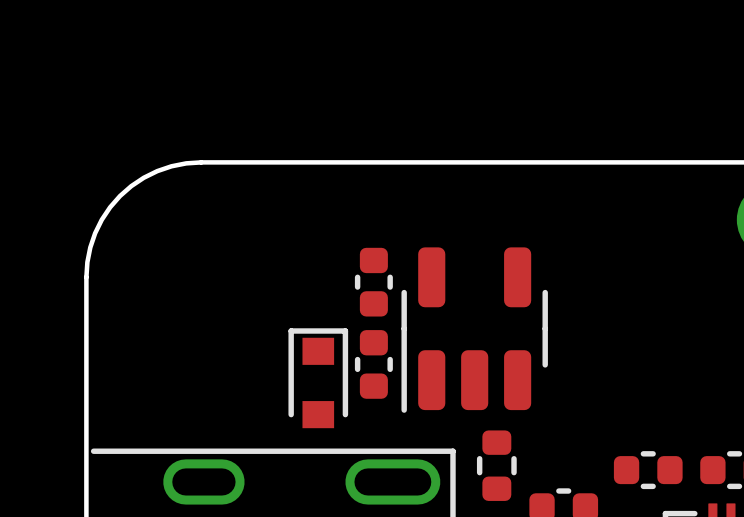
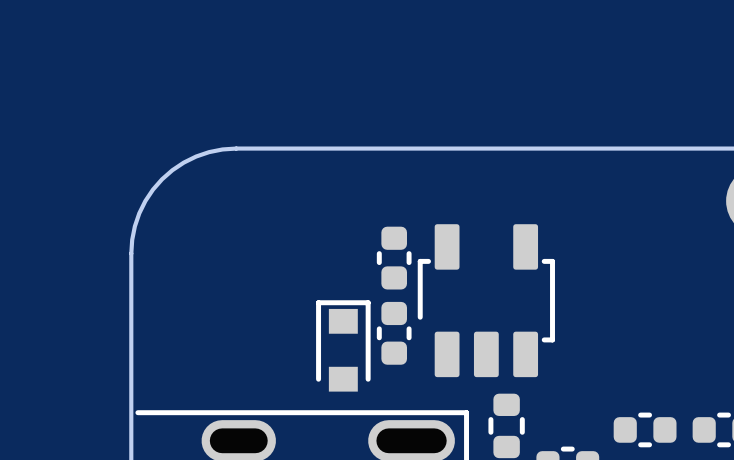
part footprint: [401, 247, 548, 413] -> [417, 224, 555, 378]

